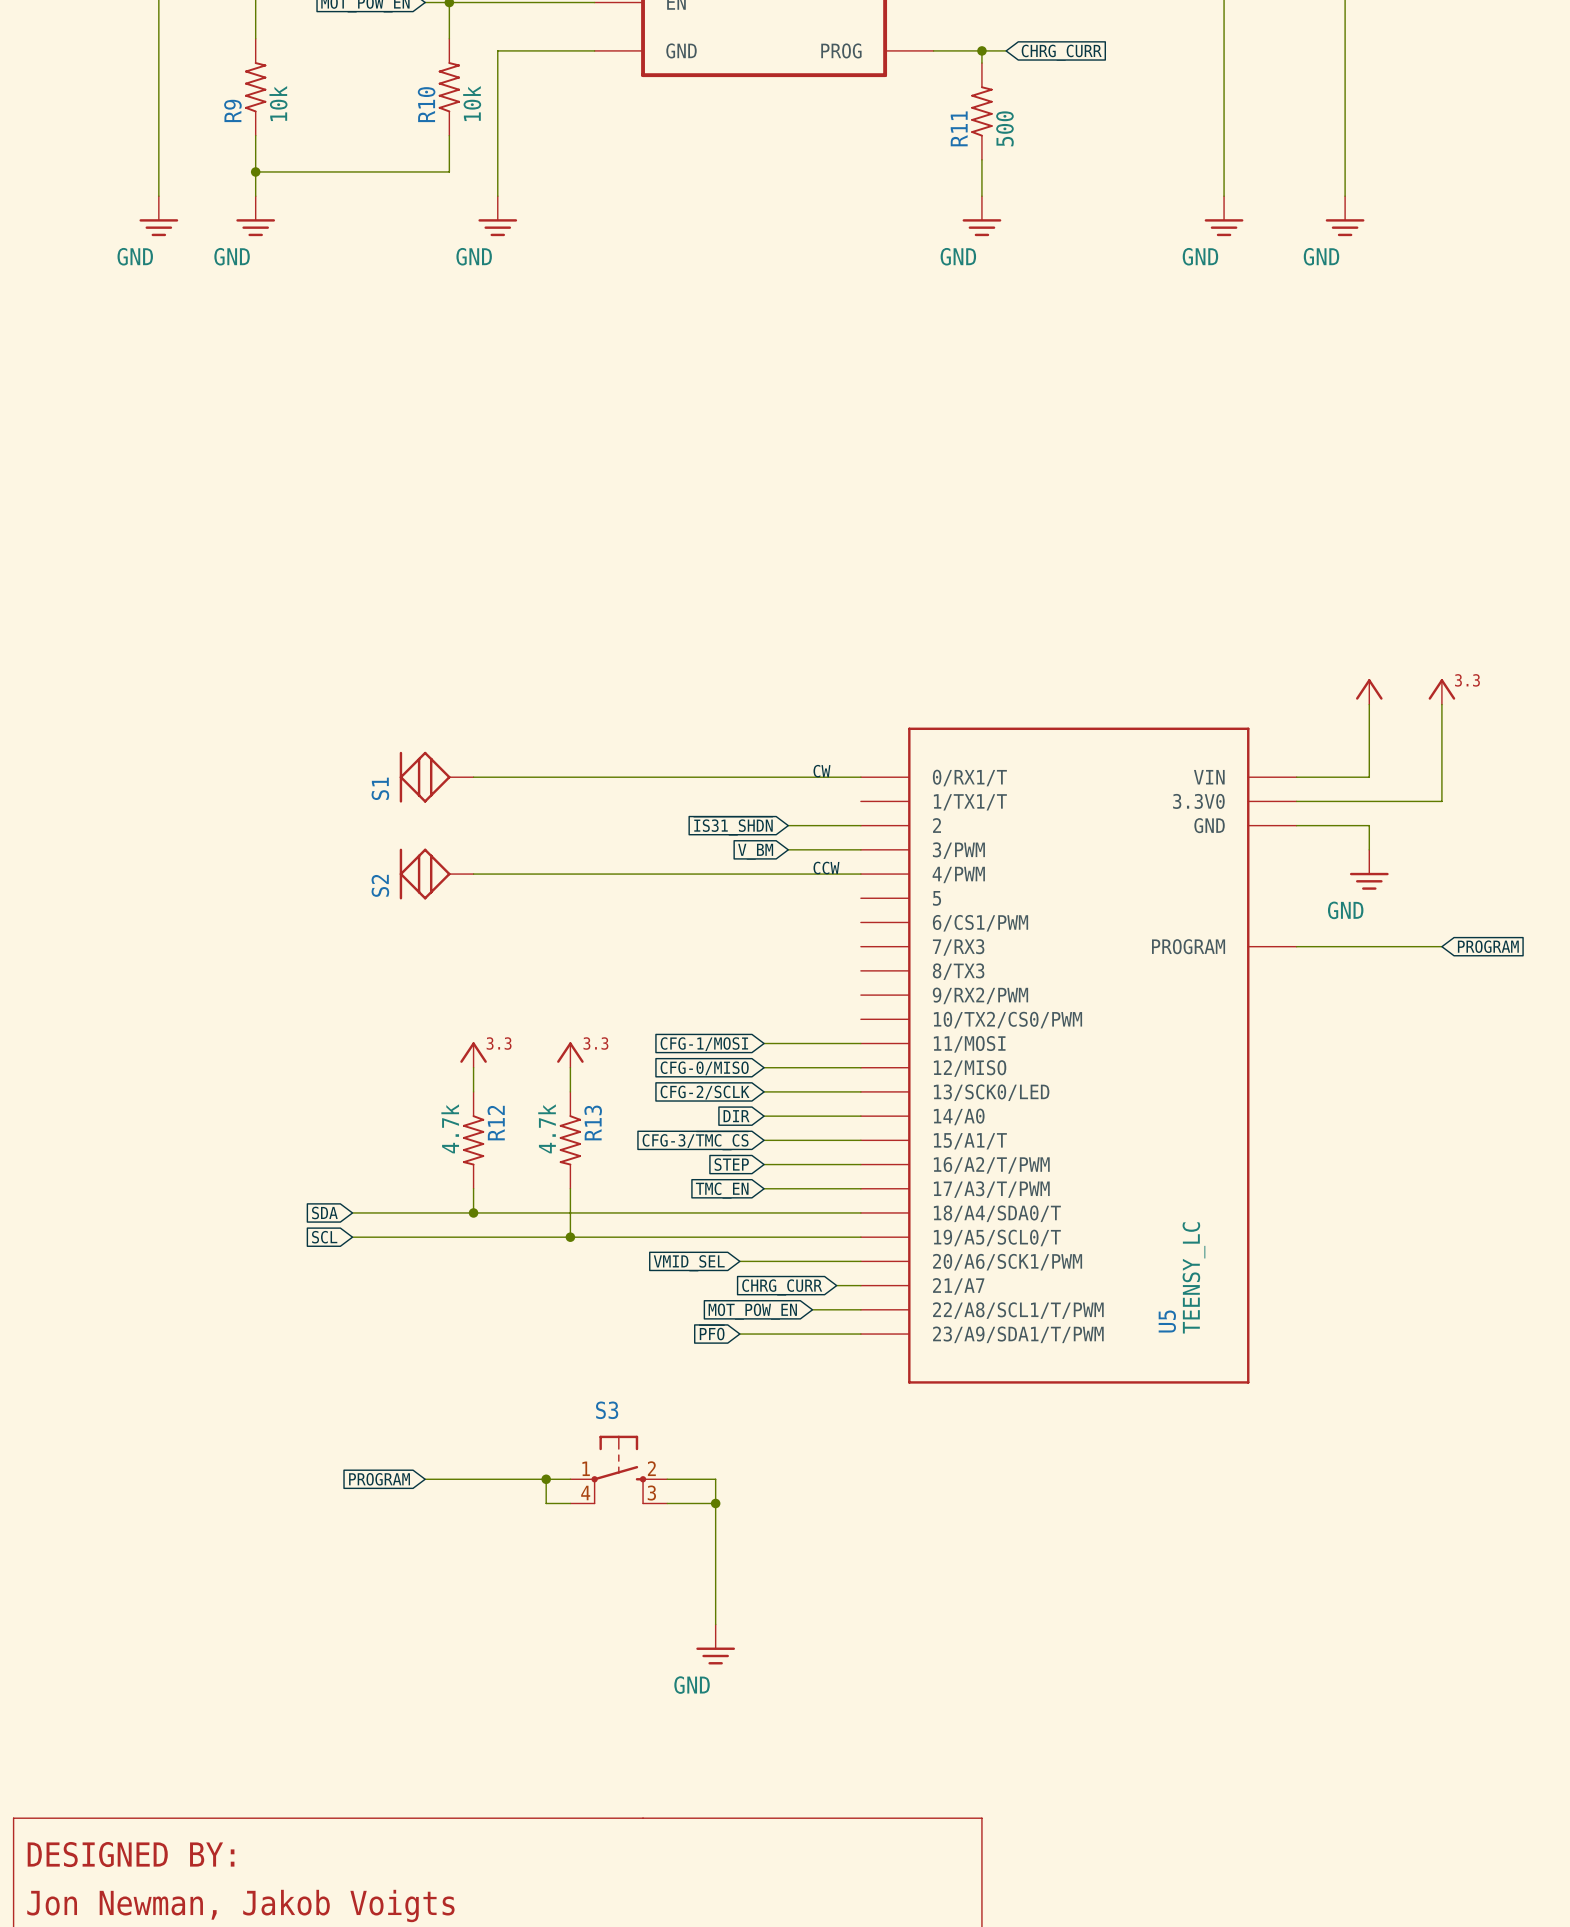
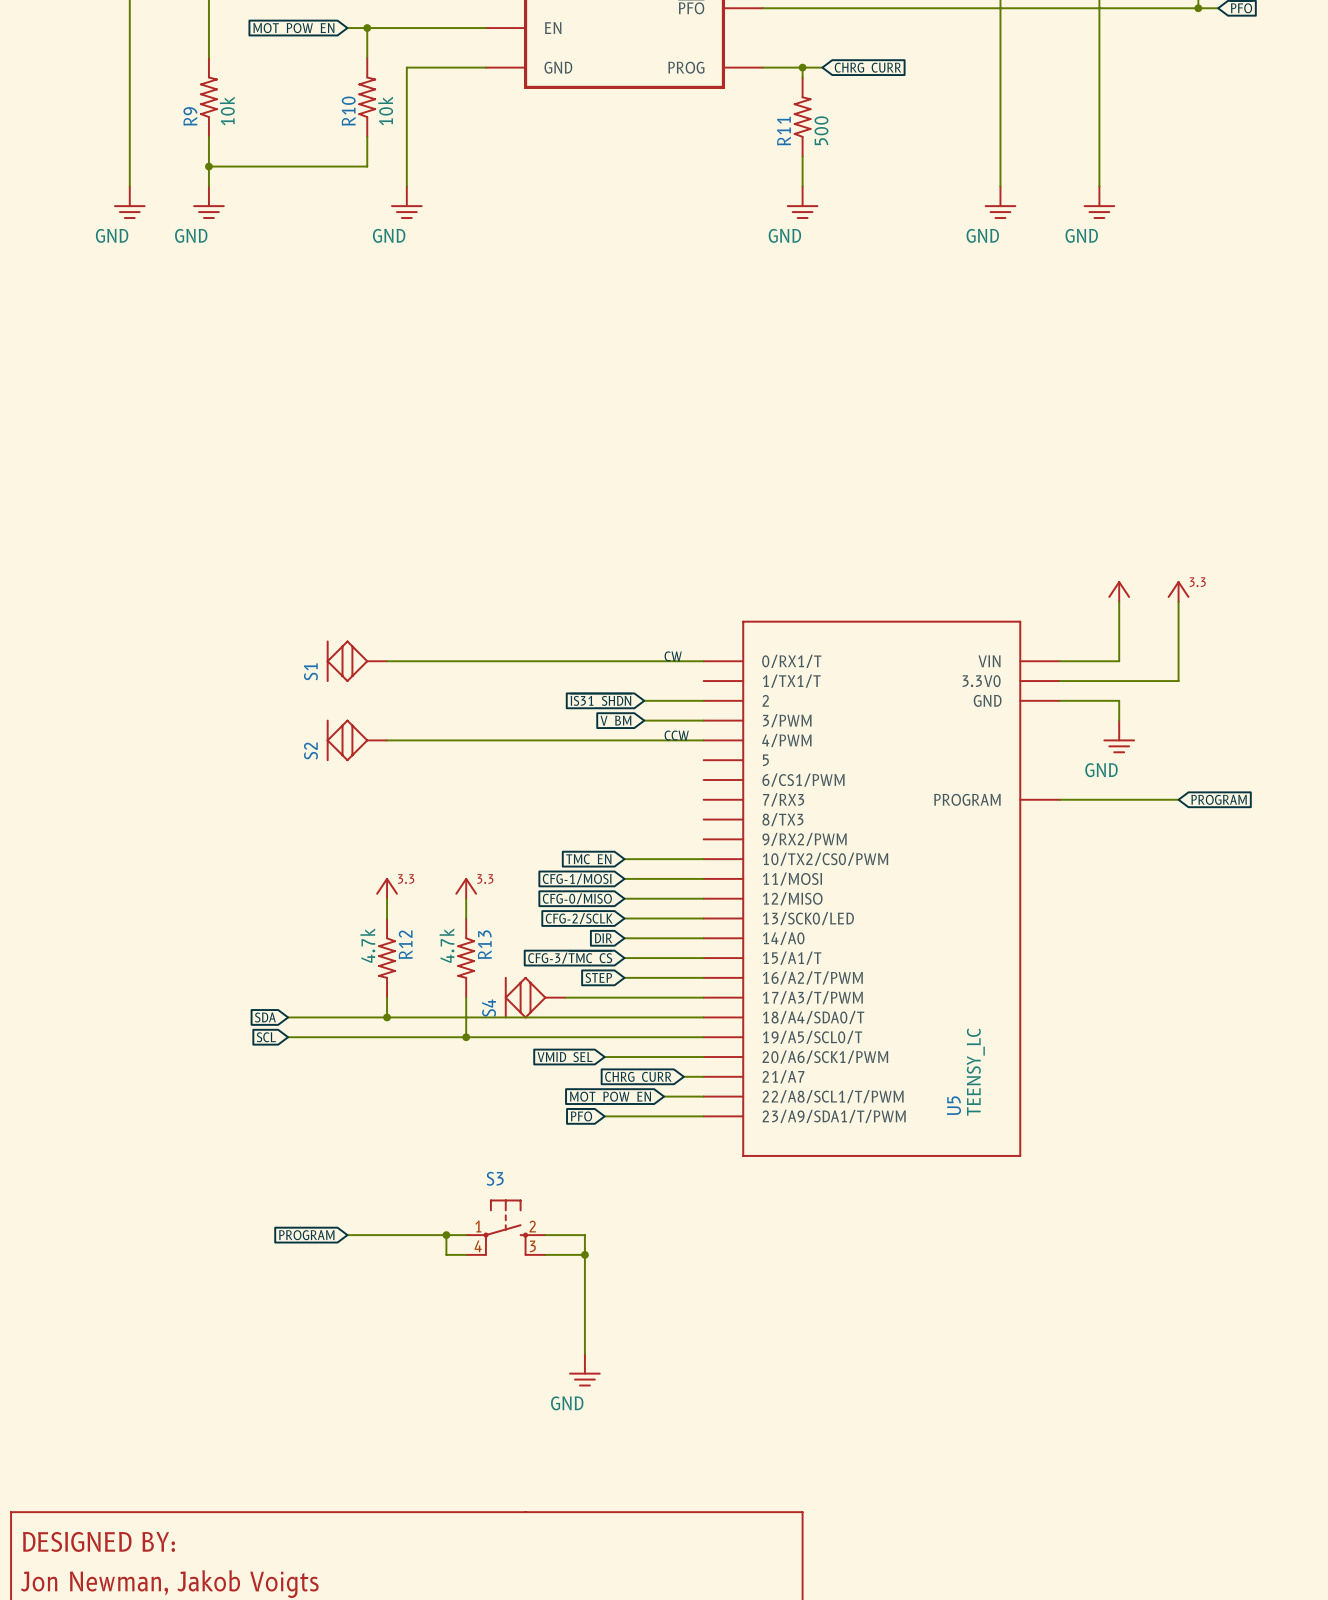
wire: none -> (624, 859) (703, 859)
S4: none -> (534, 997)
wire: none -> (565, 997) (624, 997)
global label position: TMC_EN (722, 1190) -> TMC_EN (588, 860)

